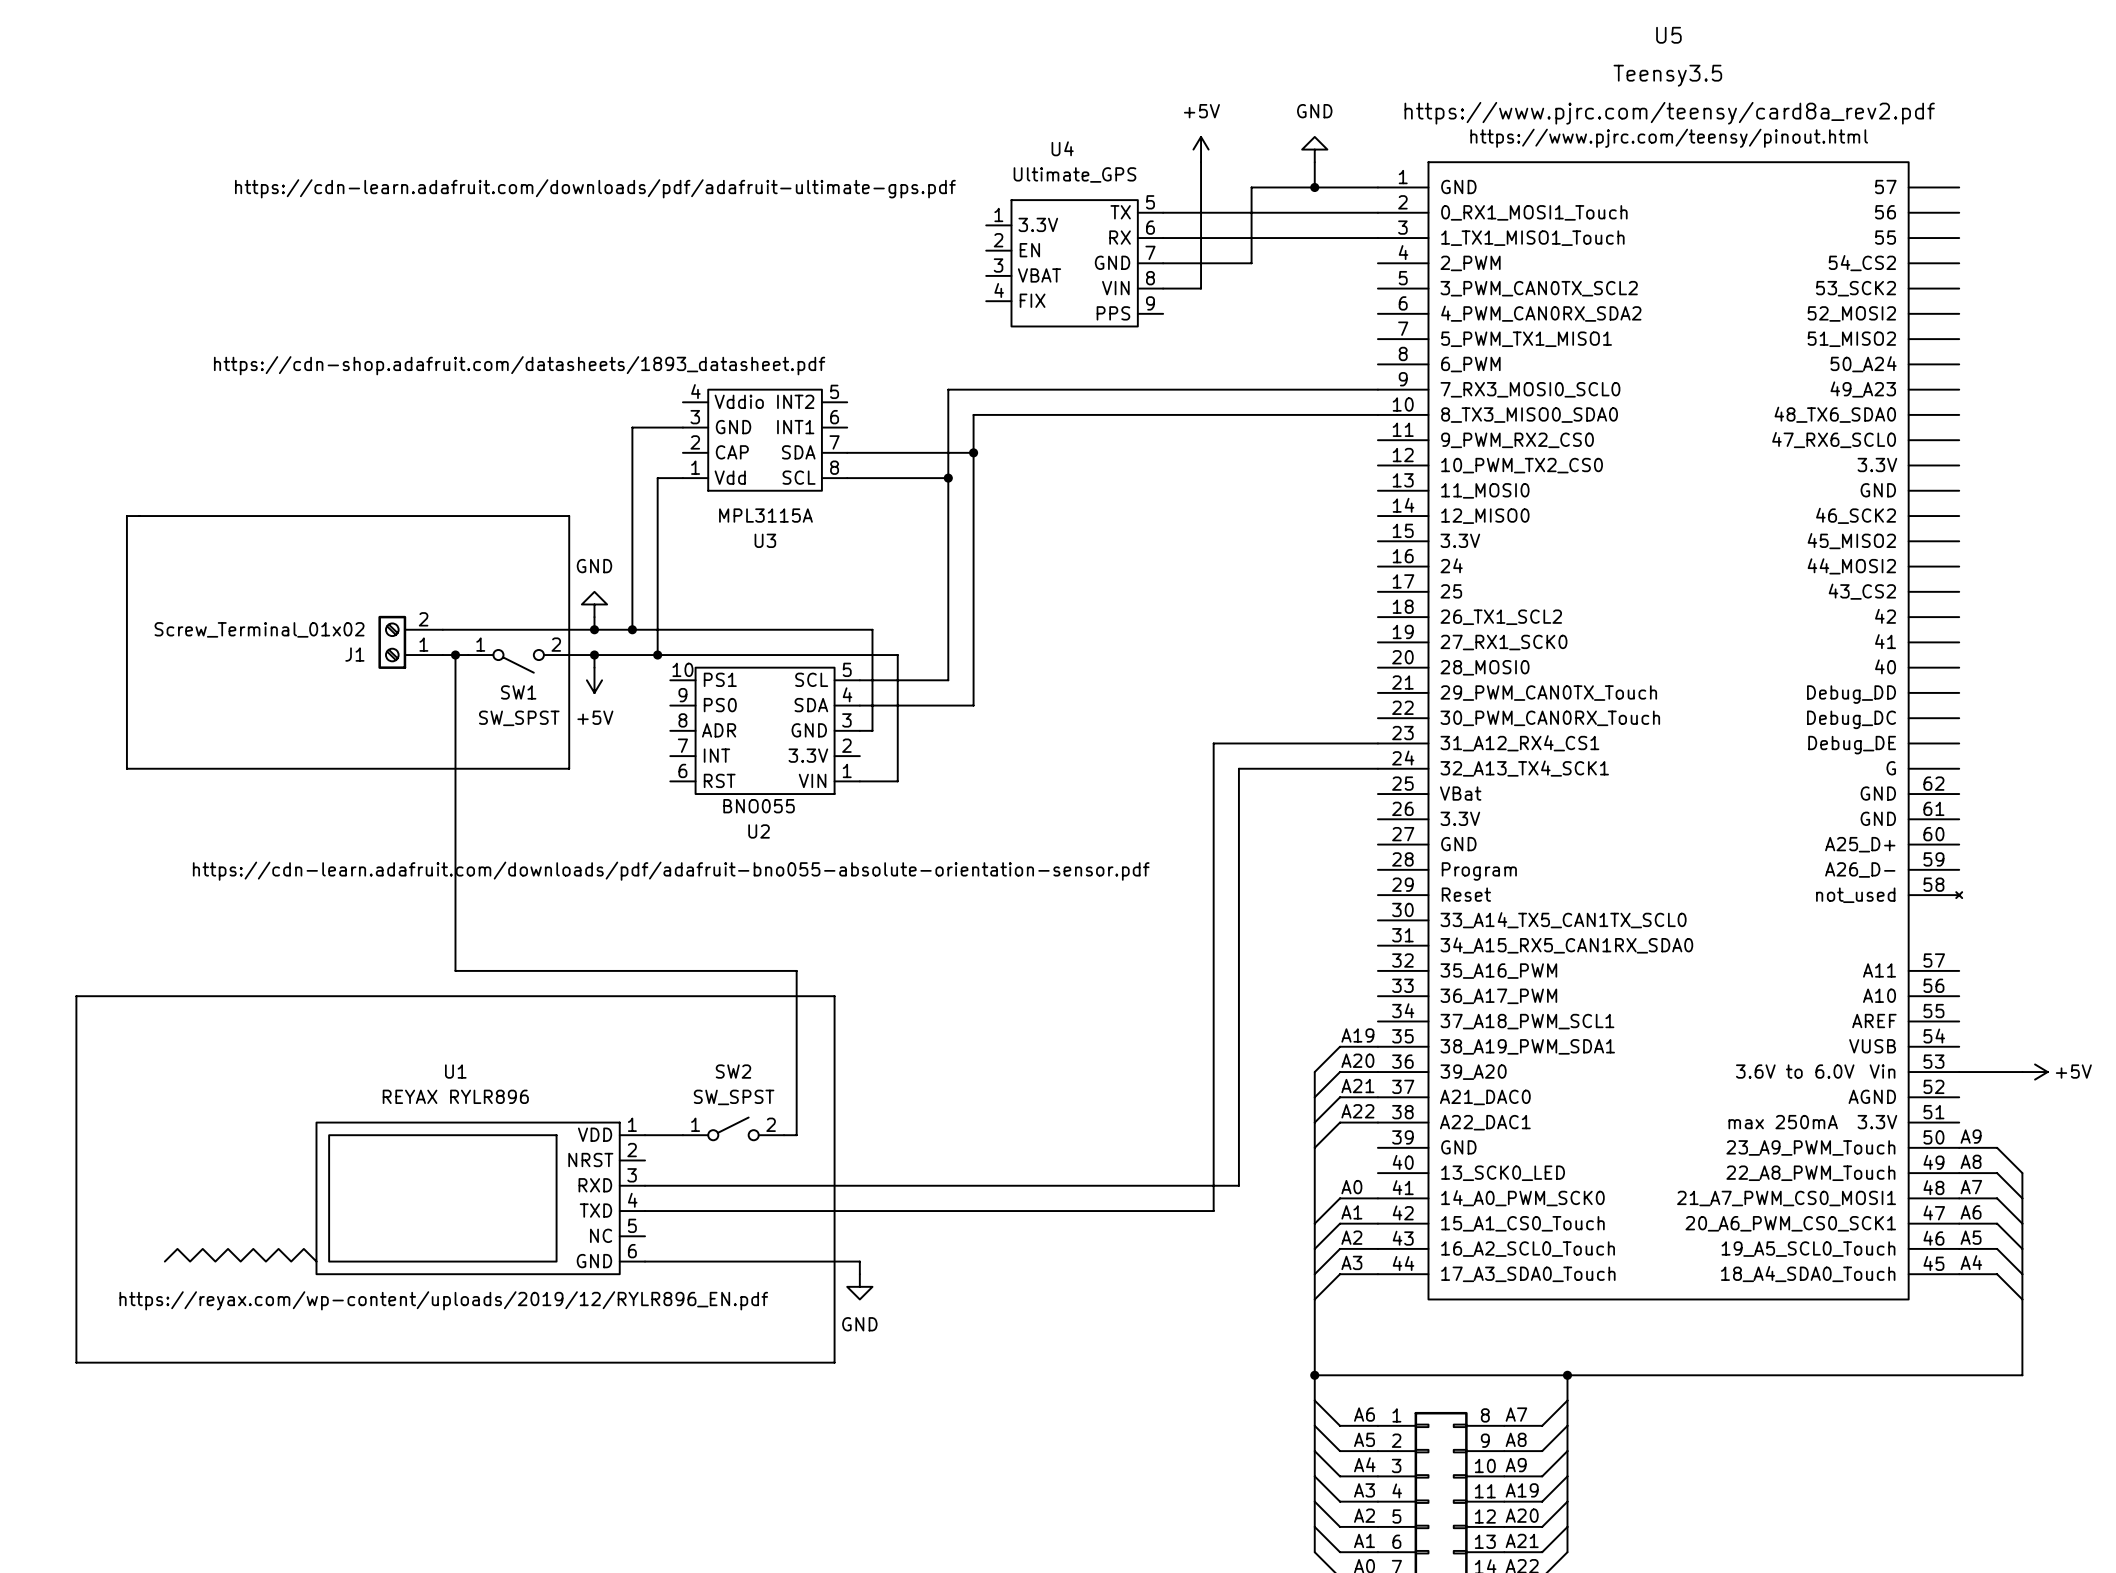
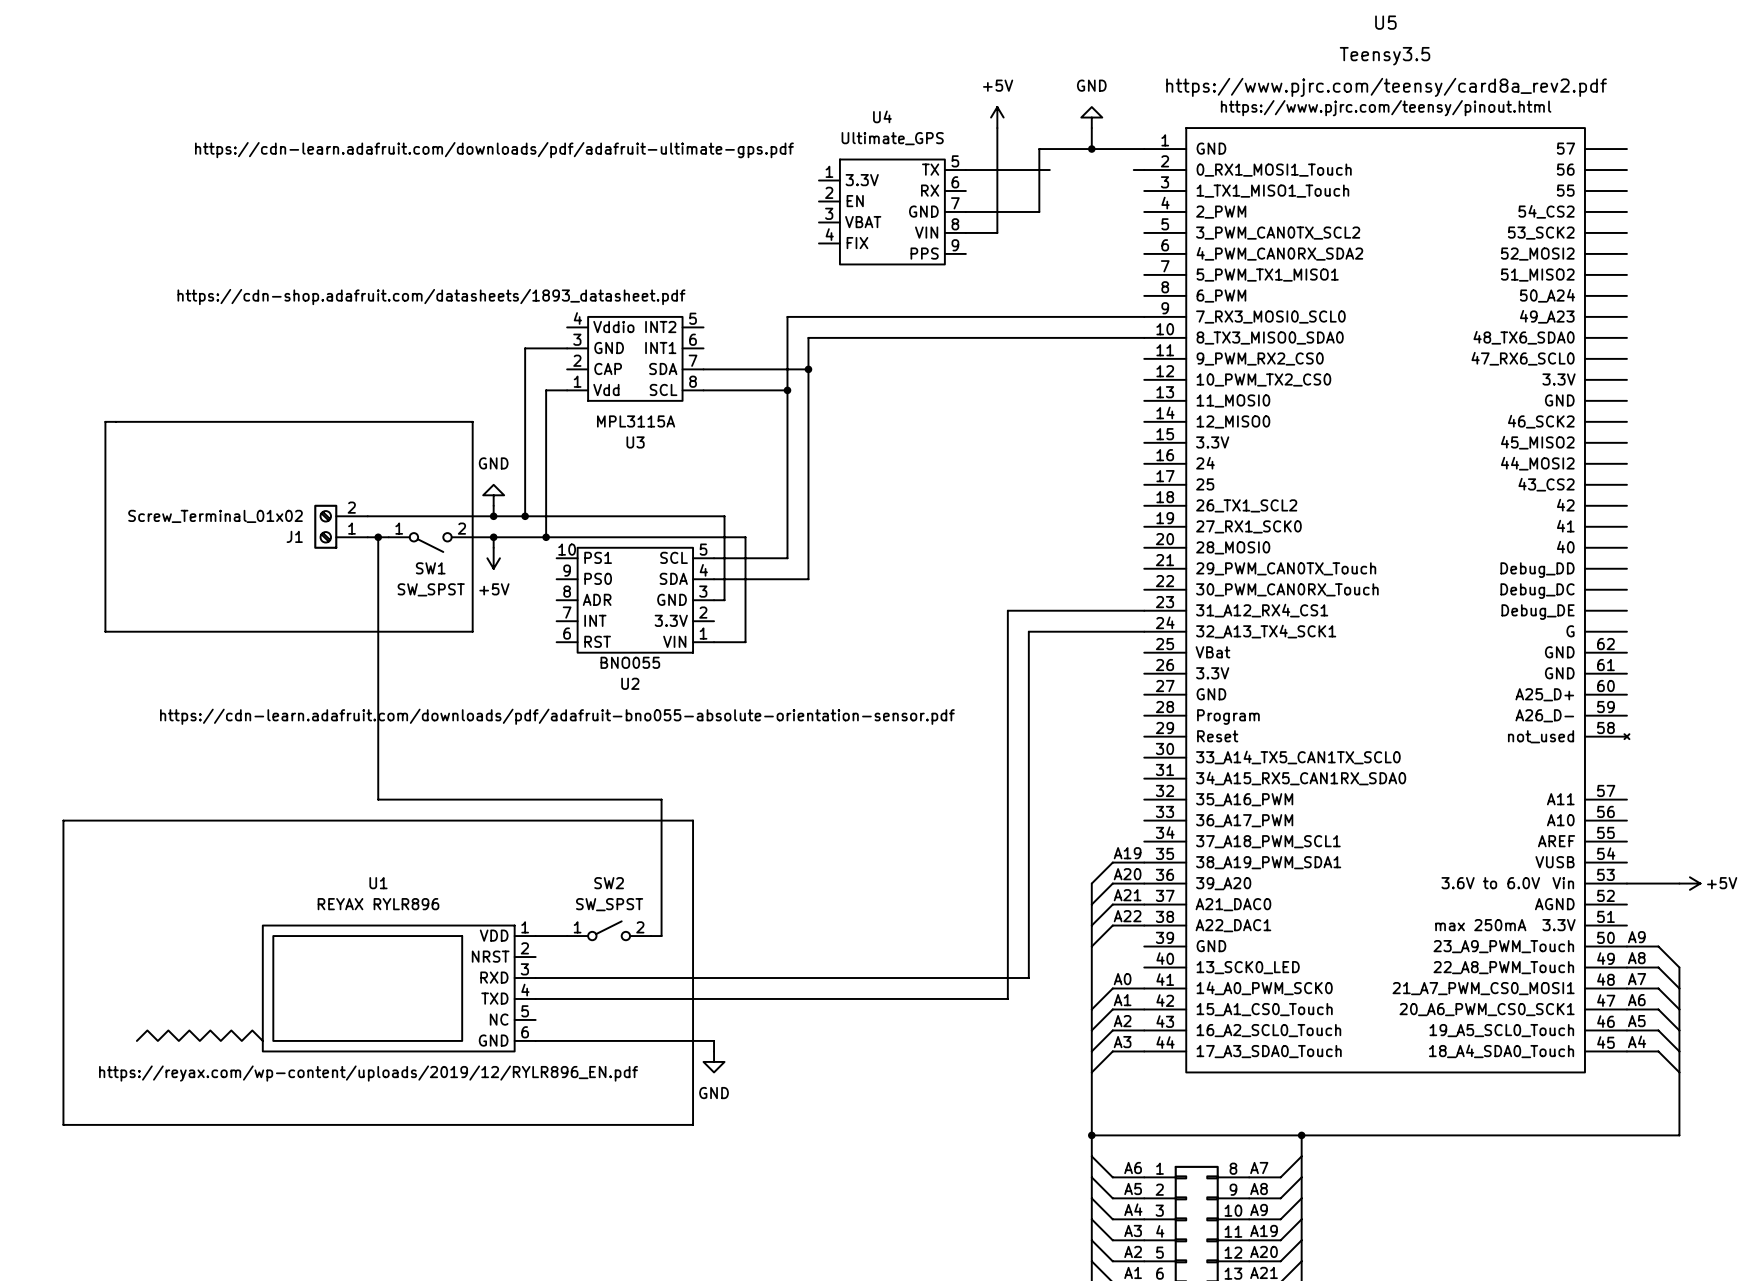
wire: (1264, 212) (1365, 212) -> none
wire: (1163, 238) (1377, 238) -> none

